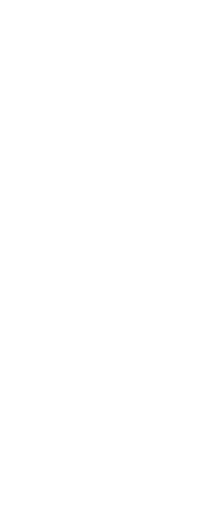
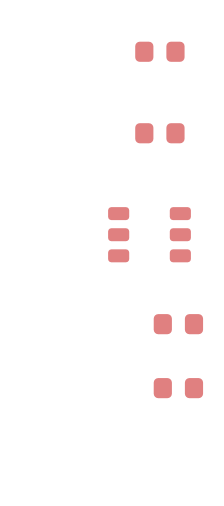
part: none -> (159, 51)
part: none -> (159, 133)
part: none -> (149, 234)
part: none -> (178, 324)
part: none -> (178, 388)

